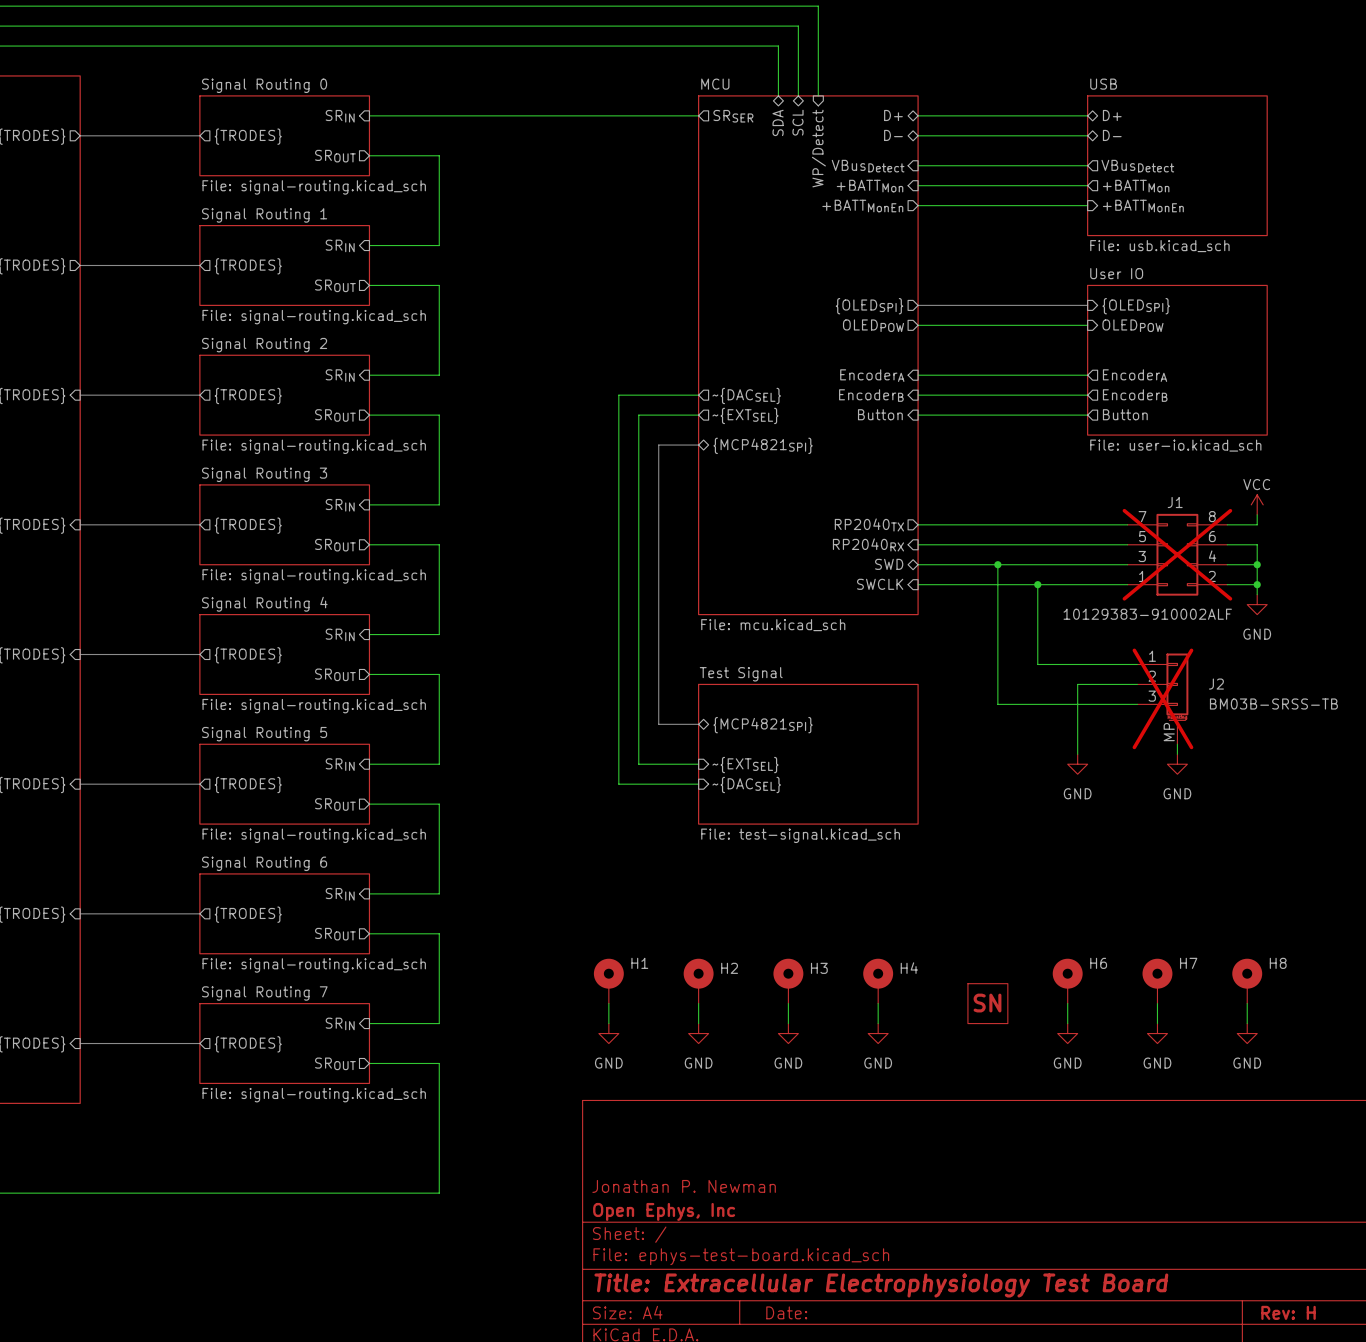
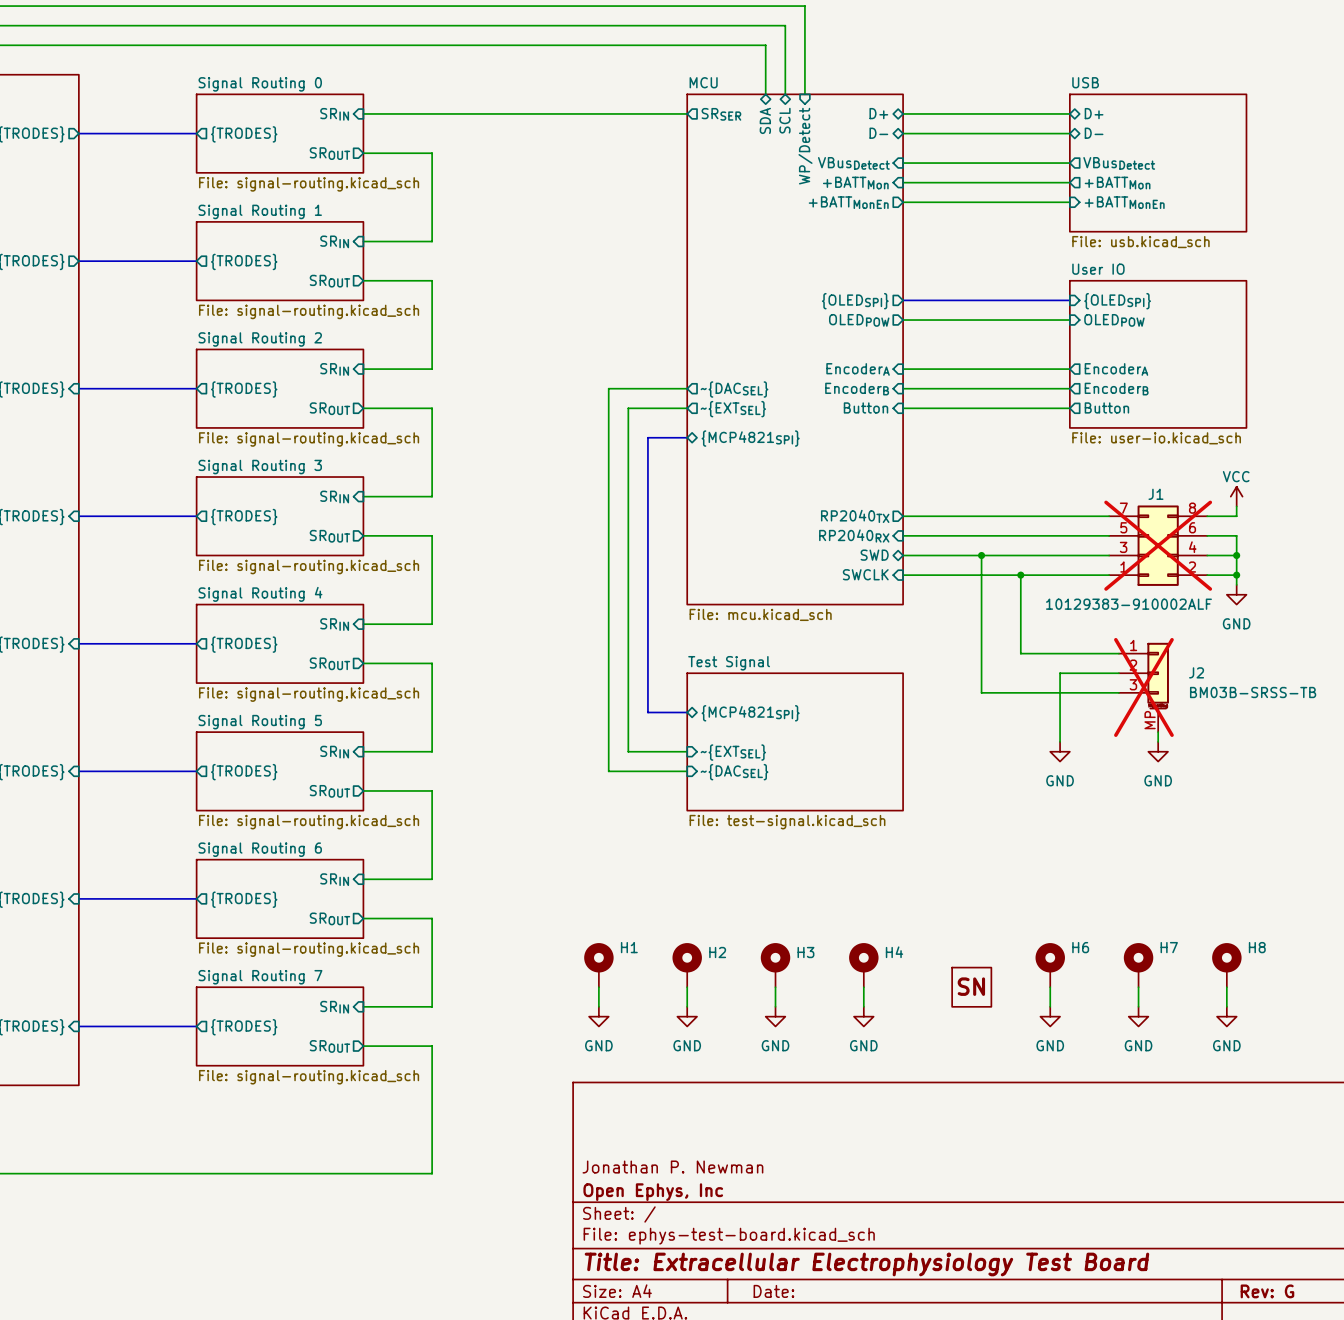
title block: Rev: H (1288, 1312) -> Rev: G (1267, 1291)

